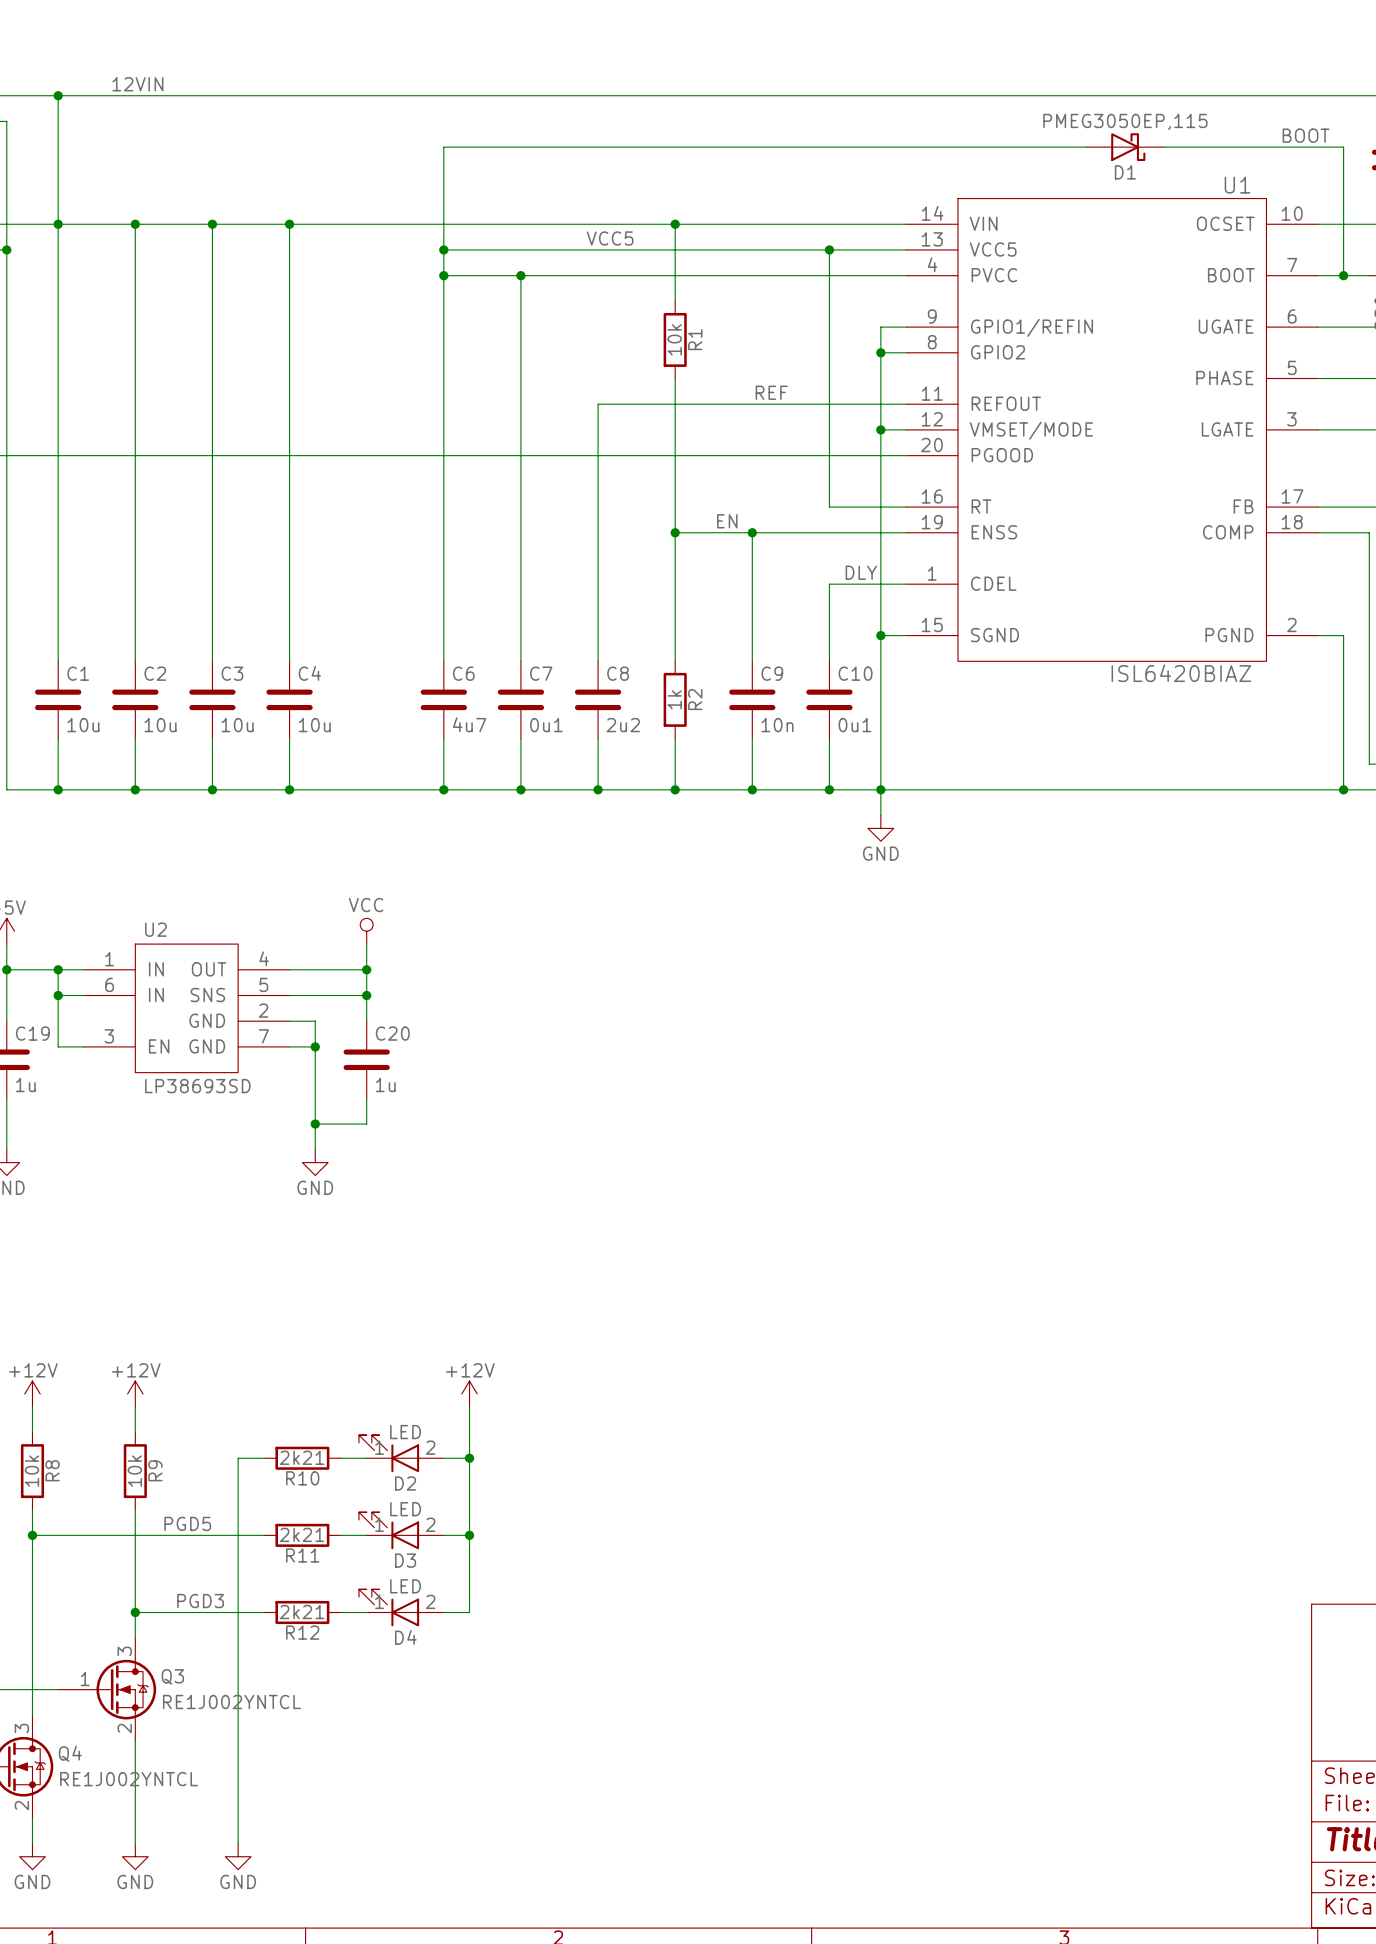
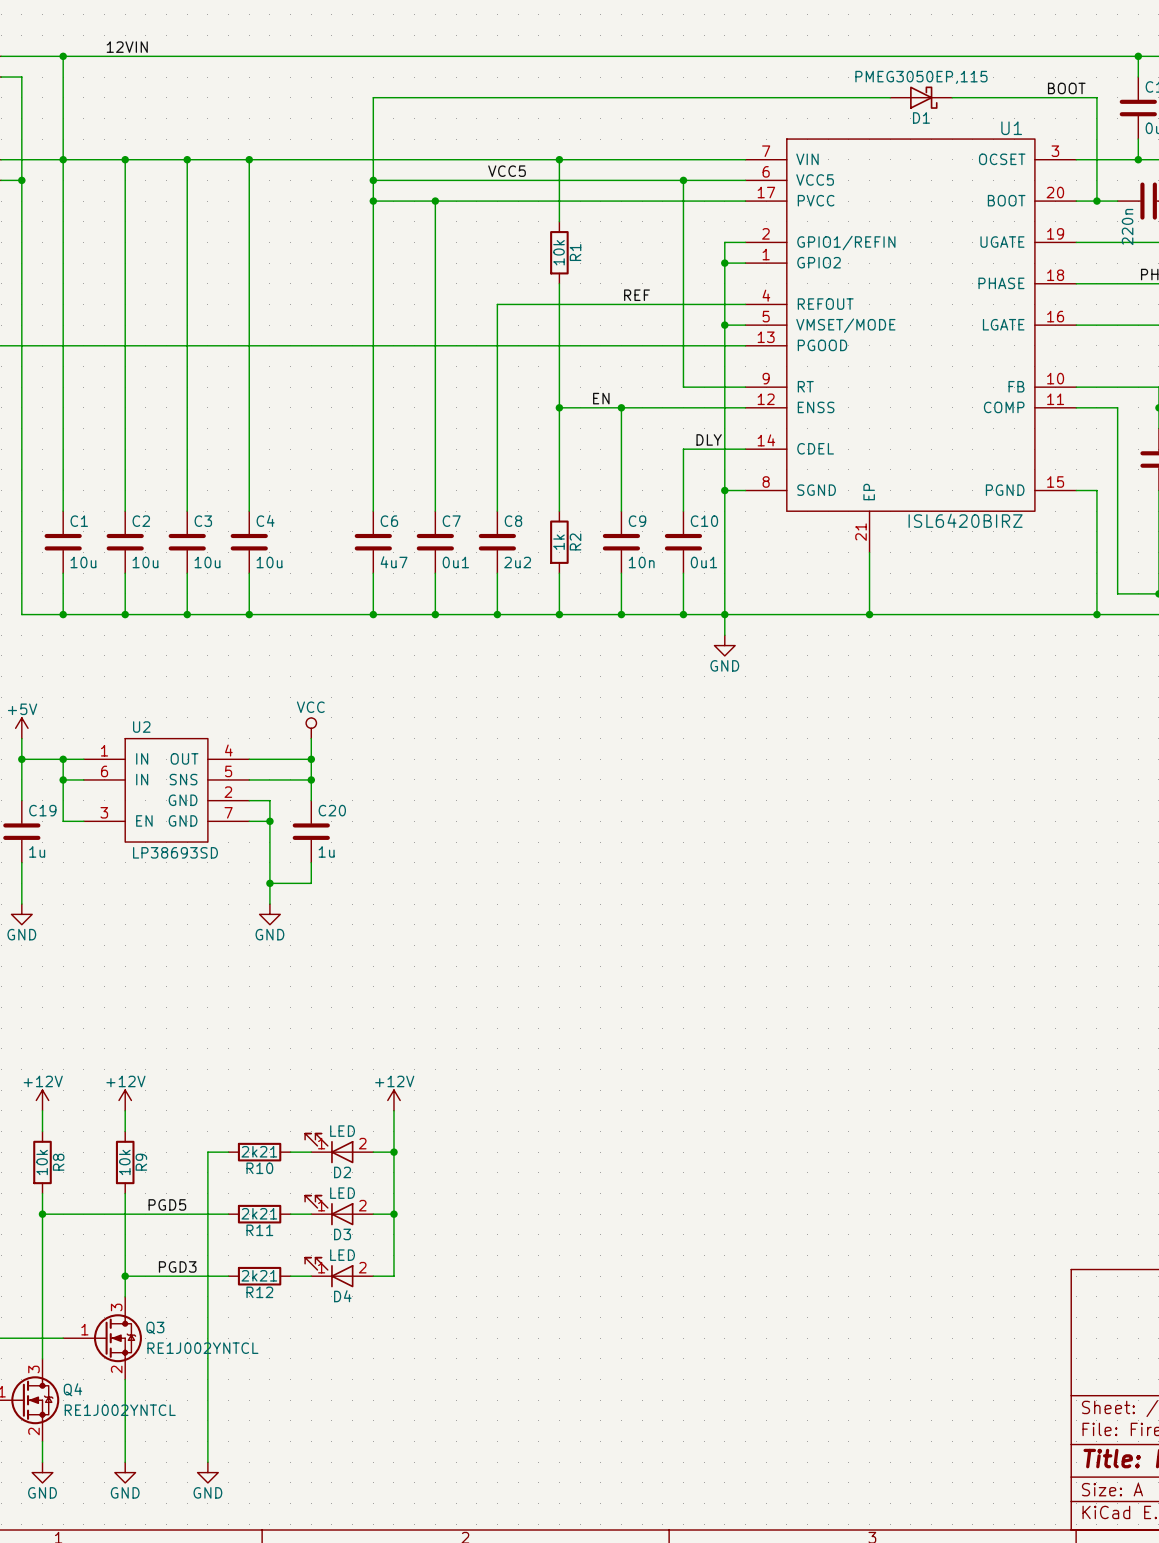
U1 symbol: [906, 198, 1318, 662] -> [745, 139, 1077, 553]
U1 value: ISL6420BIAZ (1181, 673) -> ISL6420BIRZ (965, 520)
wire: none -> (869, 552) (869, 614)
junction: none -> (869, 614)

